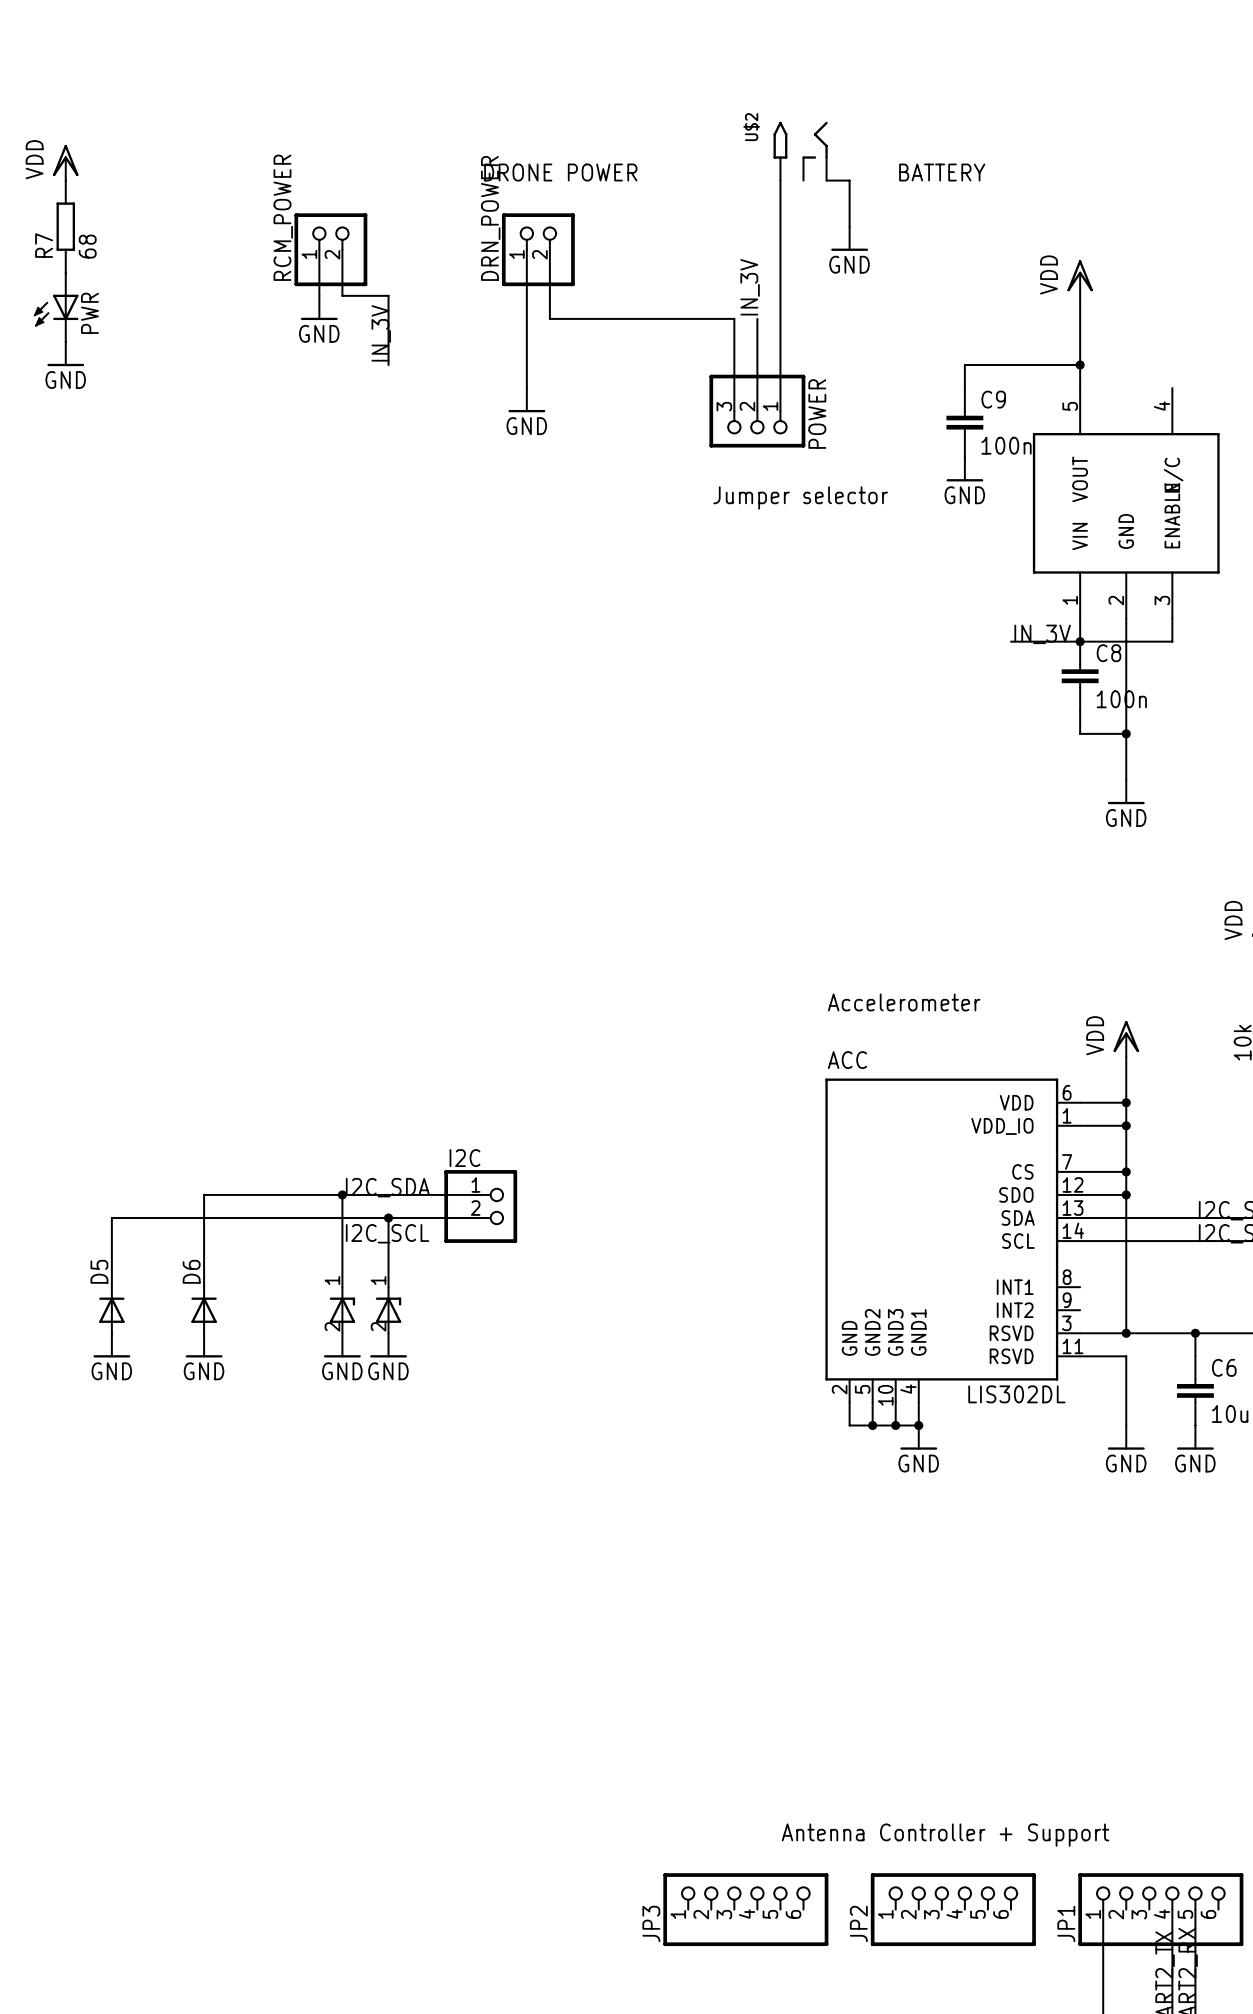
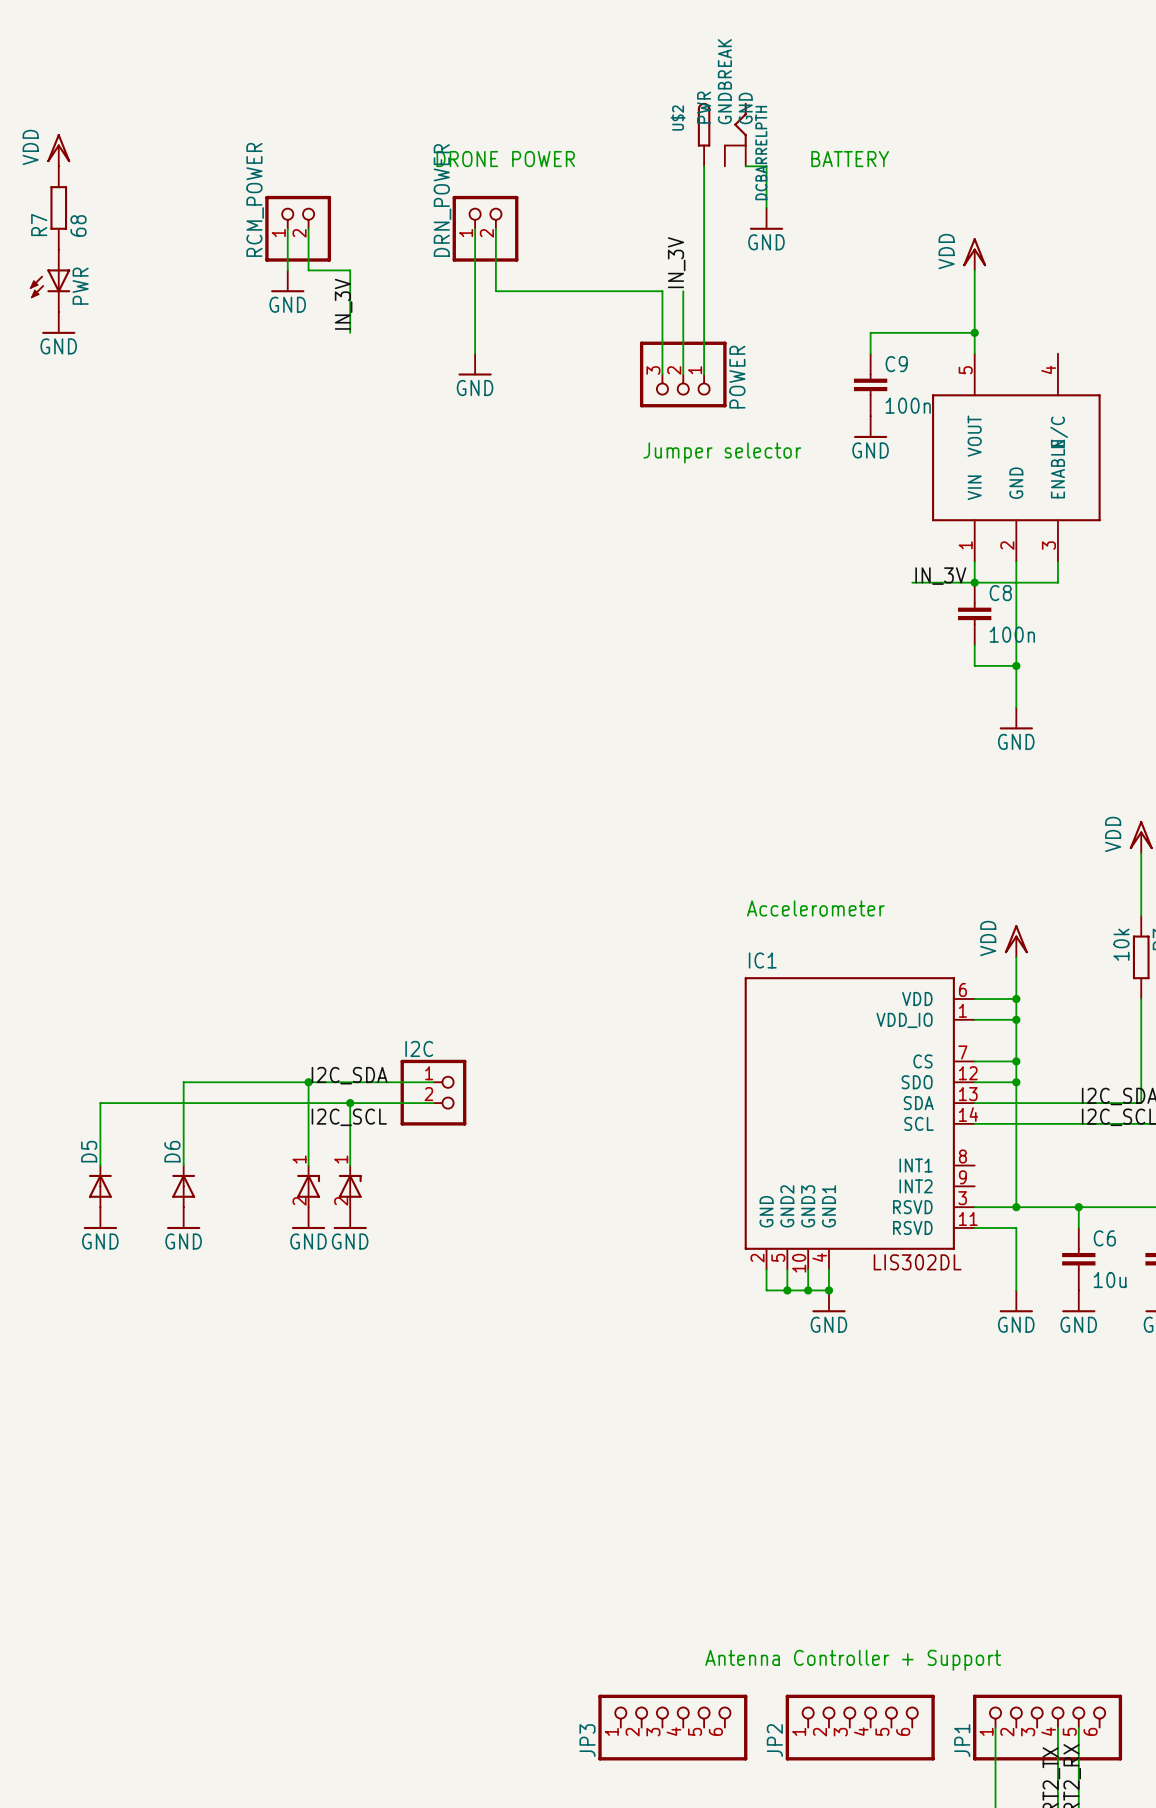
U$2 symbol: [773, 121, 828, 181] -> [697, 102, 747, 167]
U$2 value: none -> DCBARRELPTH (761, 153)
ACC name: ACC (847, 1060) -> IC1 (762, 960)

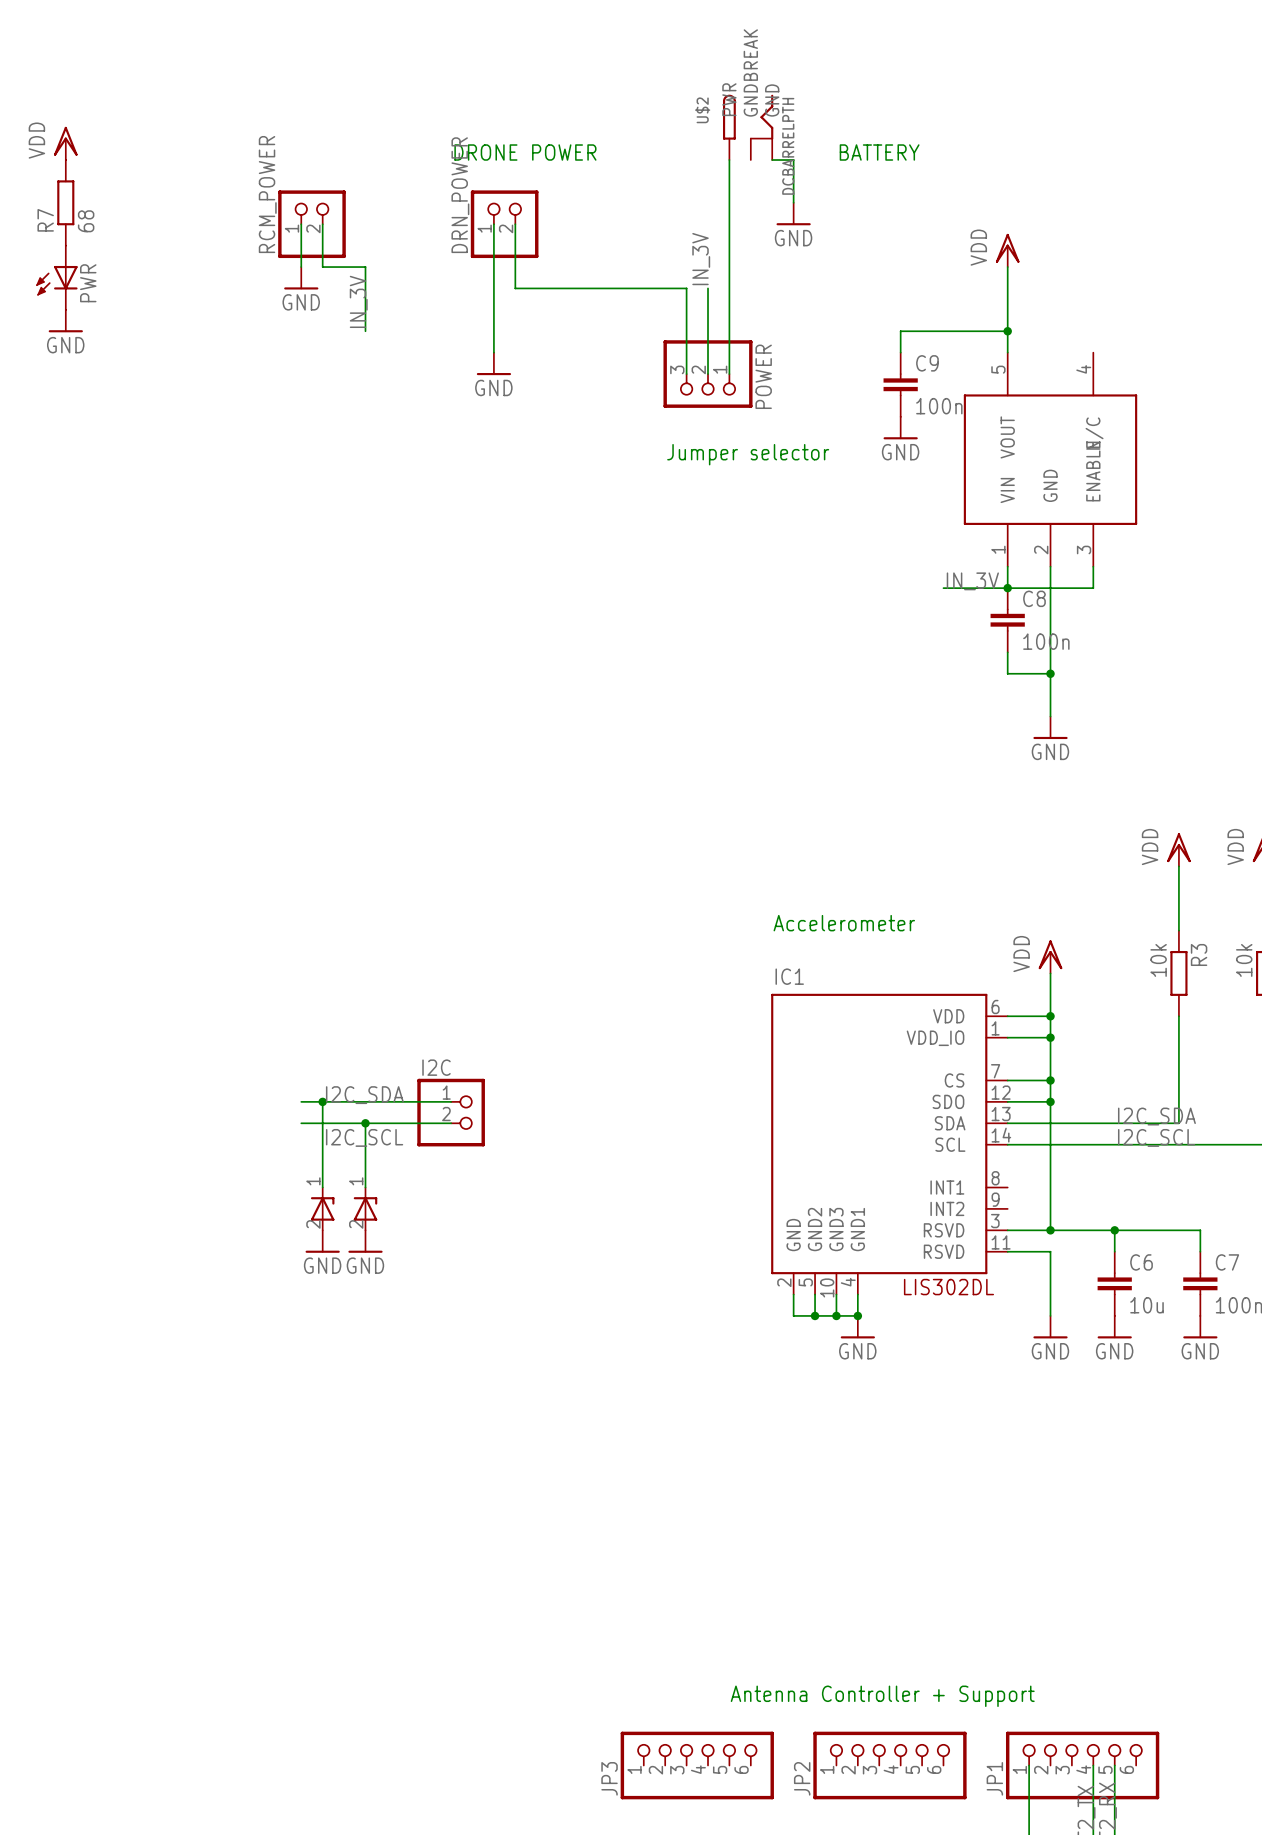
wire: (287, 1082) (183, 1082) (183, 1165) -> none
wire: (287, 1103) (100, 1103) (100, 1165) -> none
D5: (100, 1186) -> none
D6: (183, 1186) -> none
power symbol: GND (100, 1218) -> none
power symbol: GND (183, 1218) -> none

